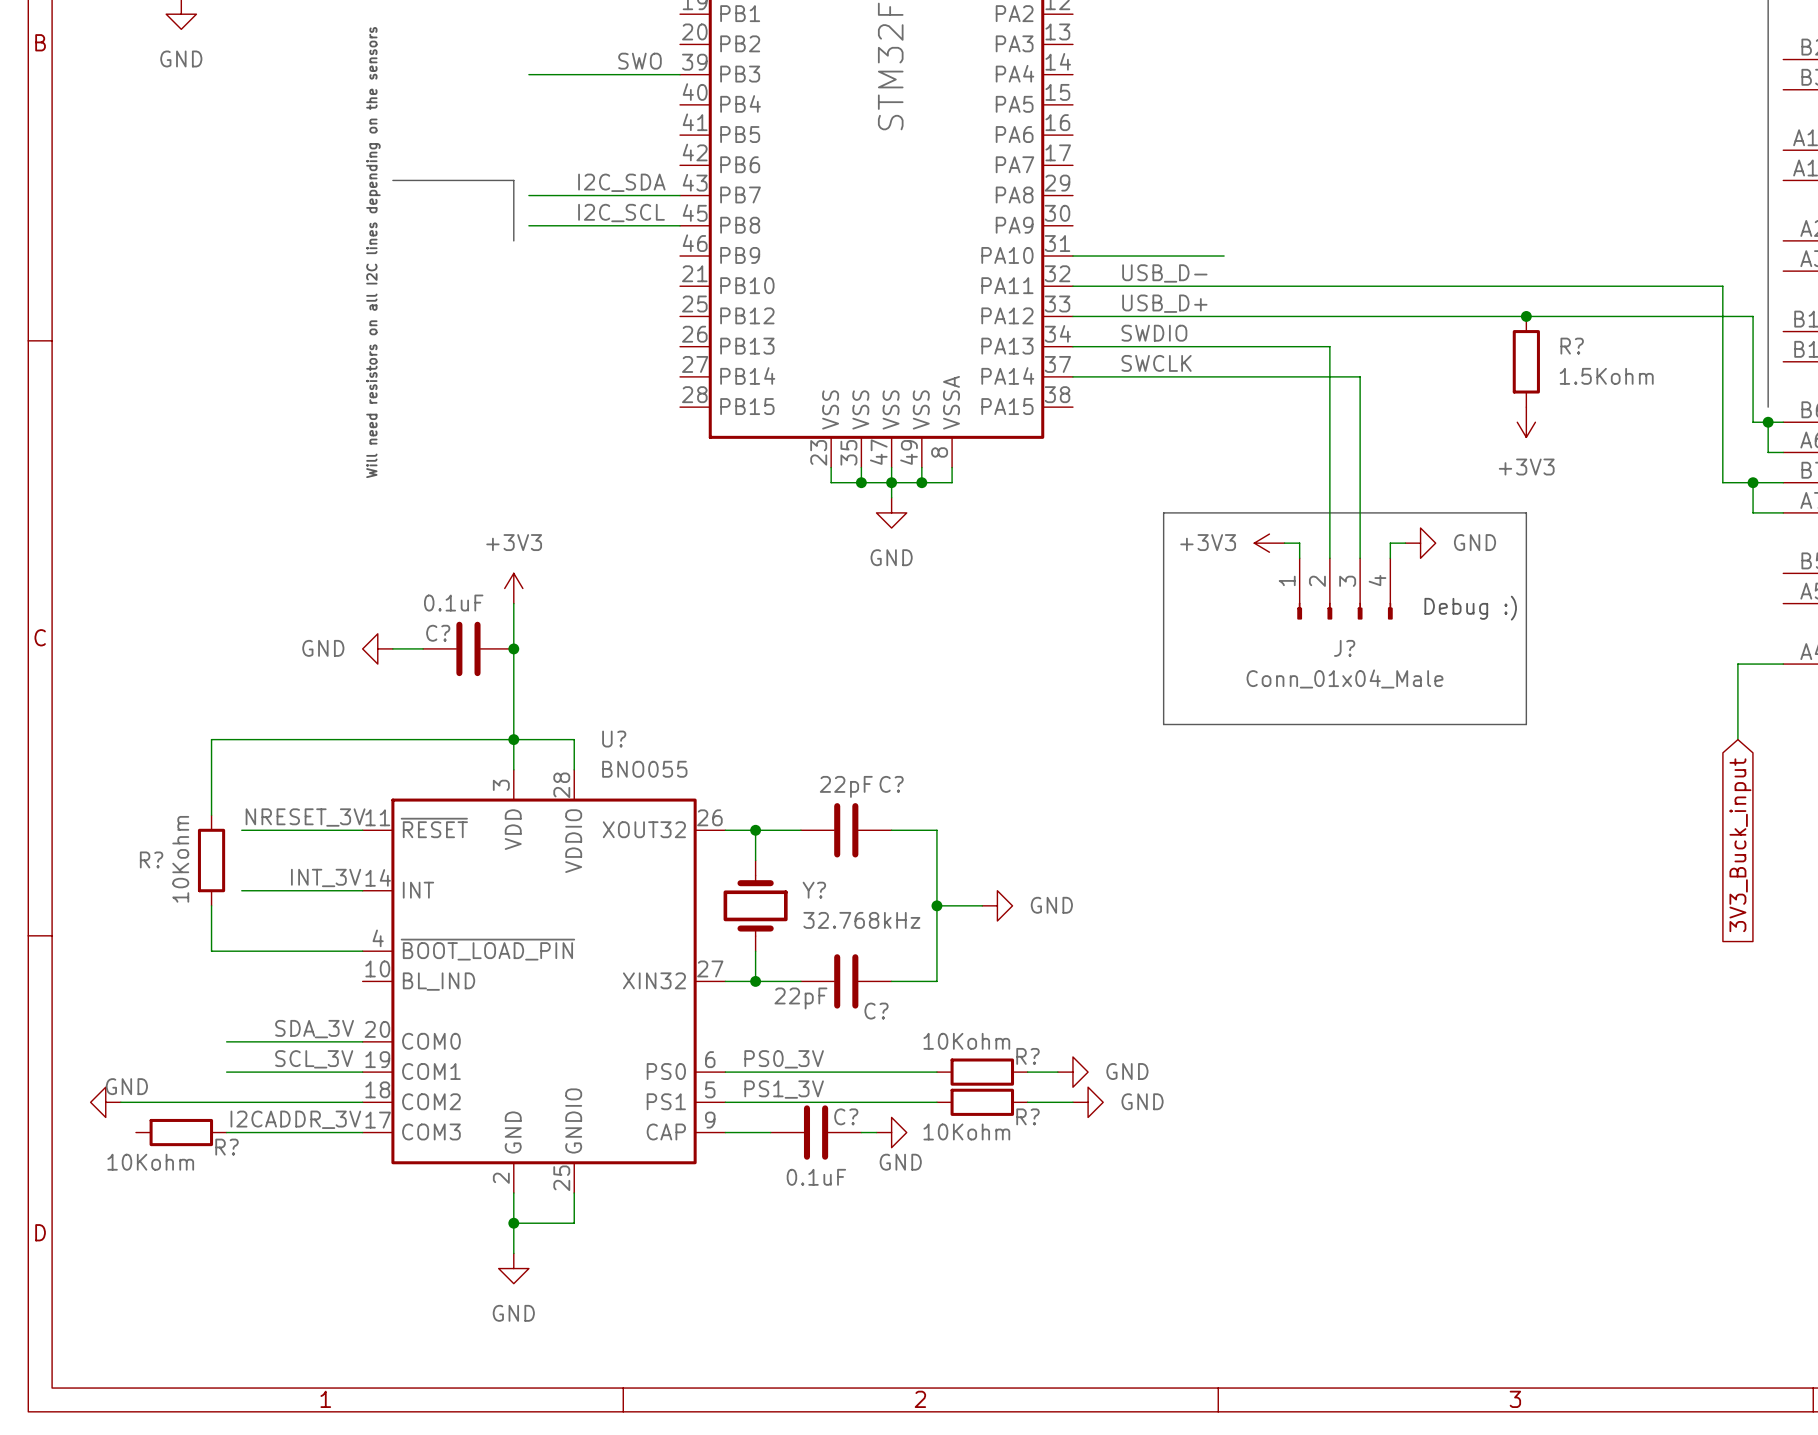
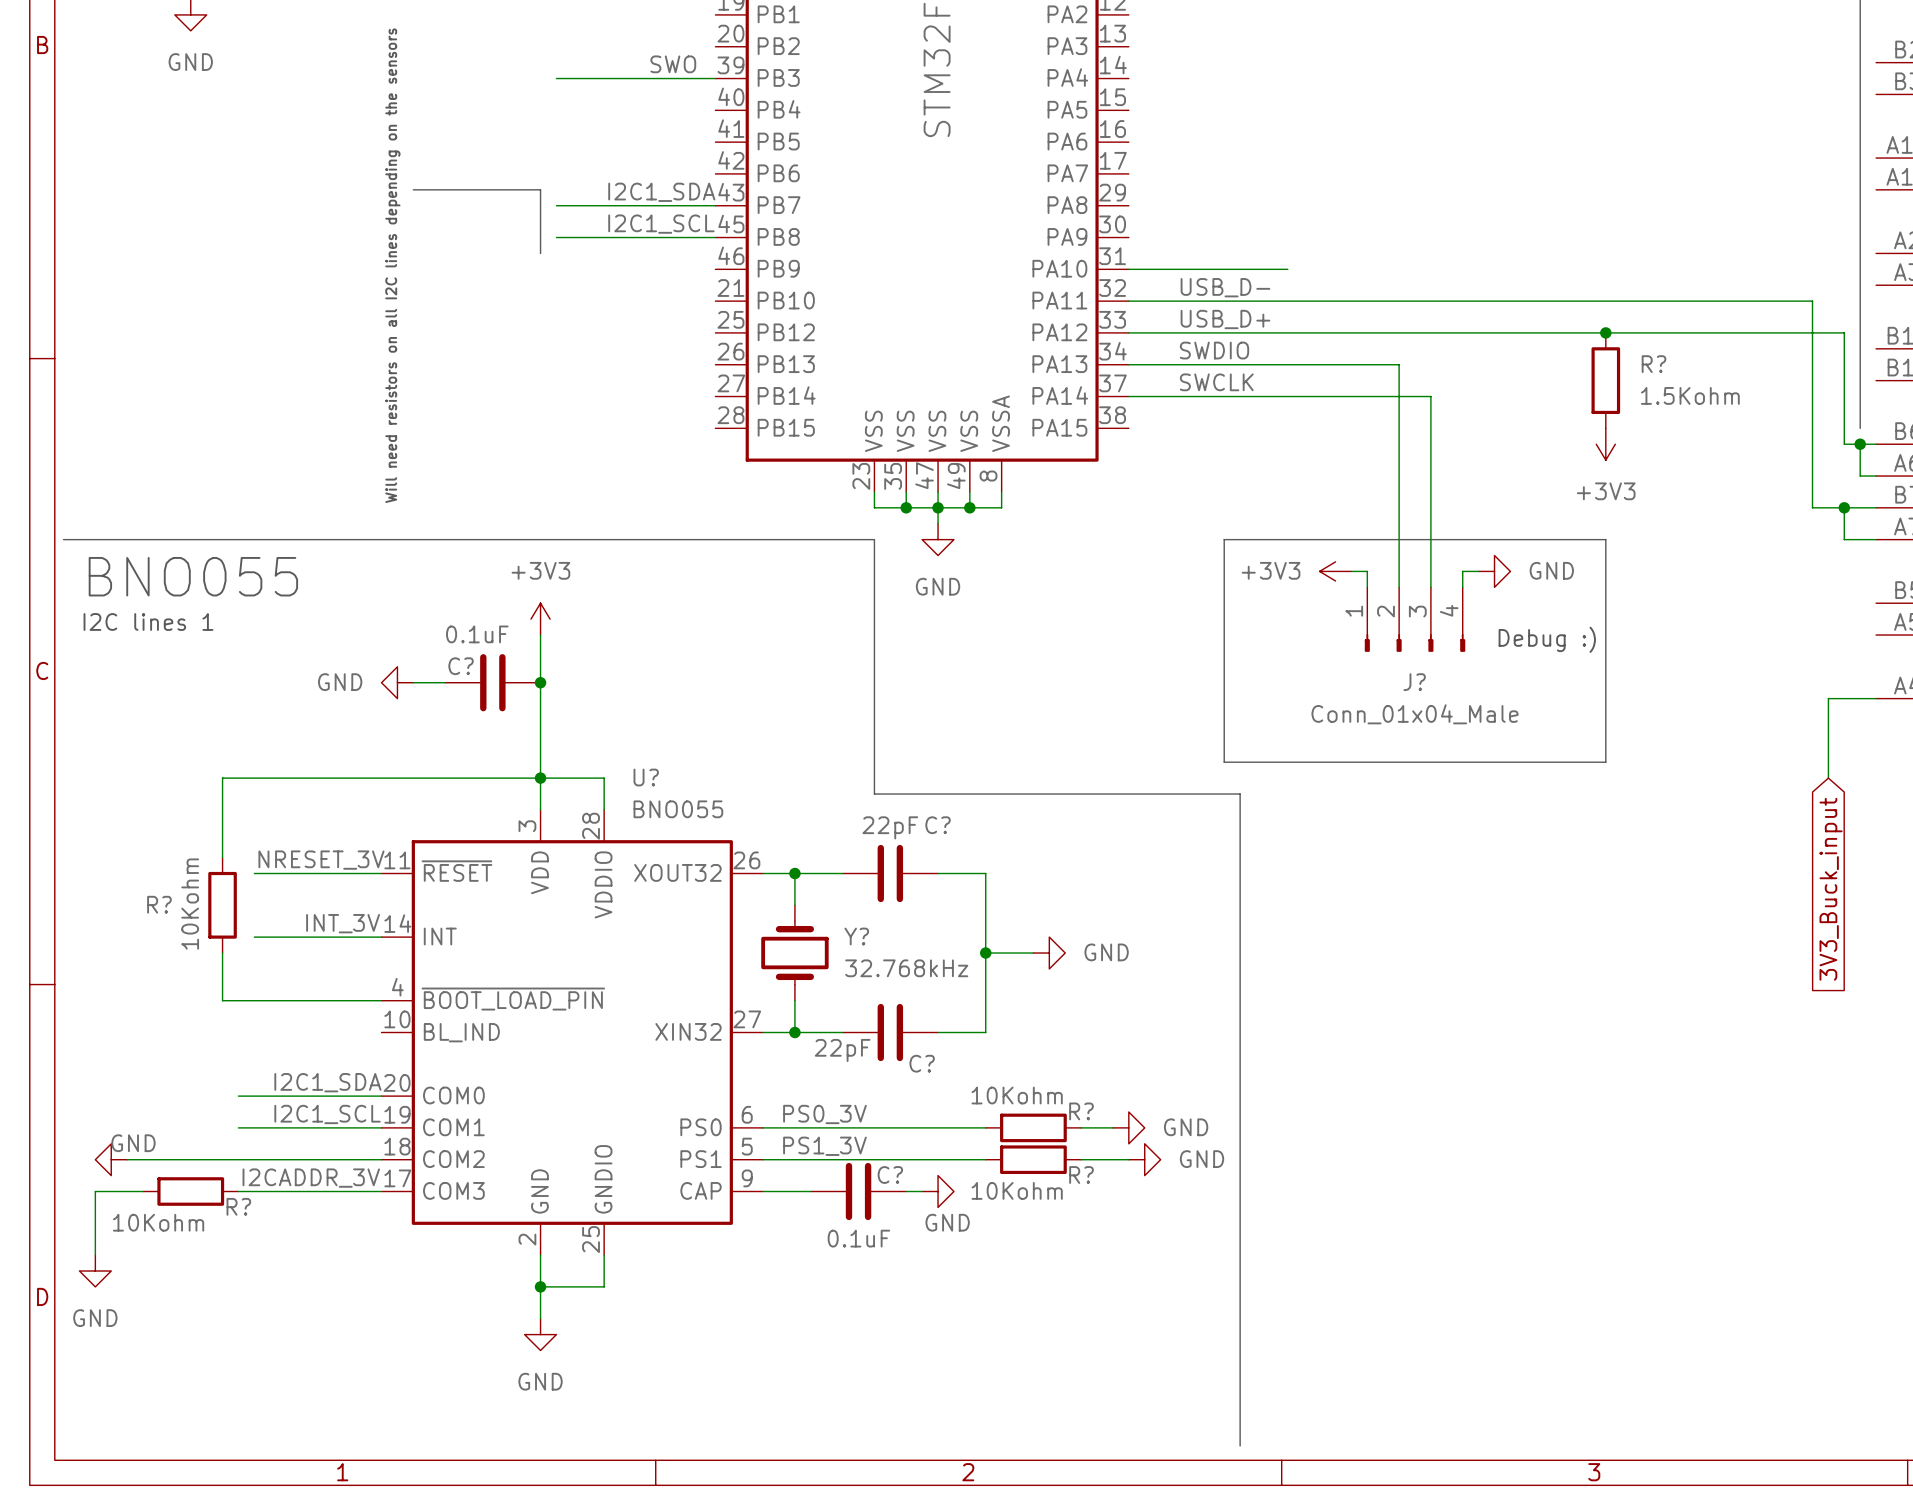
label: I2C_SDA (621, 182) -> I2C1_SDA (661, 192)
label: I2C_SCL (621, 213) -> I2C1_SCL (661, 224)
line: none -> (63, 539) (874, 539) (874, 794) (1240, 794) (1240, 1445)
text: none -> BNO055 (193, 576)
text: none -> I2C lines 1 (148, 621)
label: none -> I2C1_SDA (327, 1082)
label: SDA_3V (314, 1029) -> none
label: none -> I2C1_SCL (327, 1114)
label: SCL_3V (314, 1059) -> none
wire: none -> (143, 1191) (95, 1191) (95, 1255)
power symbol: none -> GND (95, 1271)

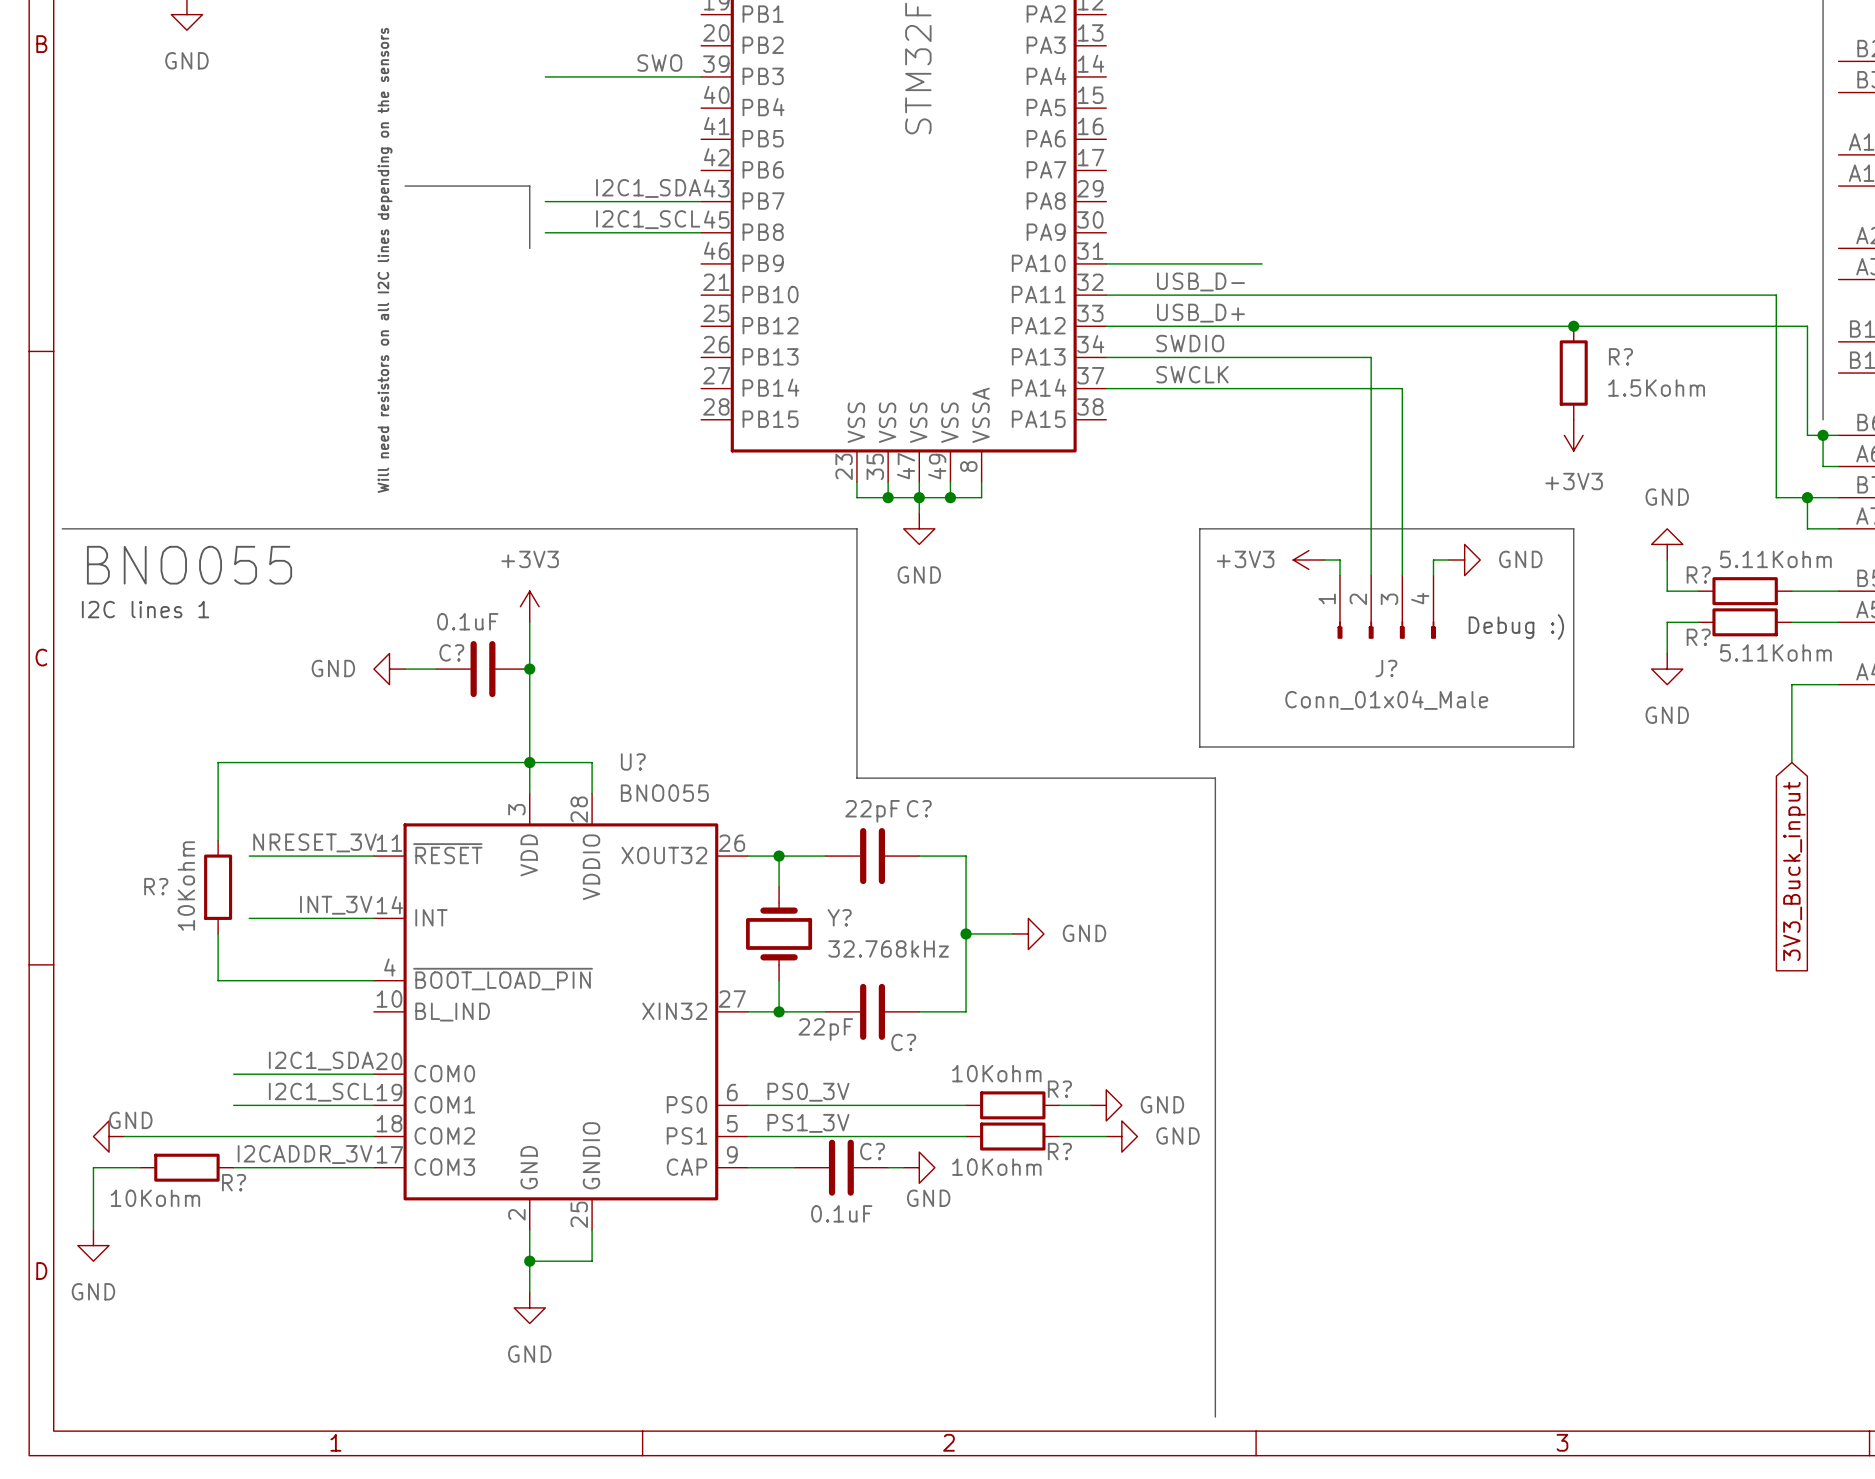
power symbol: none -> GND (1667, 544)
wire: none -> (1667, 560) (1667, 591) (1698, 591)
R?: none -> 5.11Kohm (1745, 591)
wire: none -> (1791, 591) (1838, 591)
wire: none -> (1698, 622) (1667, 622) (1667, 653)
R?: none -> 5.11Kohm (1745, 622)
wire: none -> (1791, 622) (1838, 622)
power symbol: none -> GND (1667, 669)

